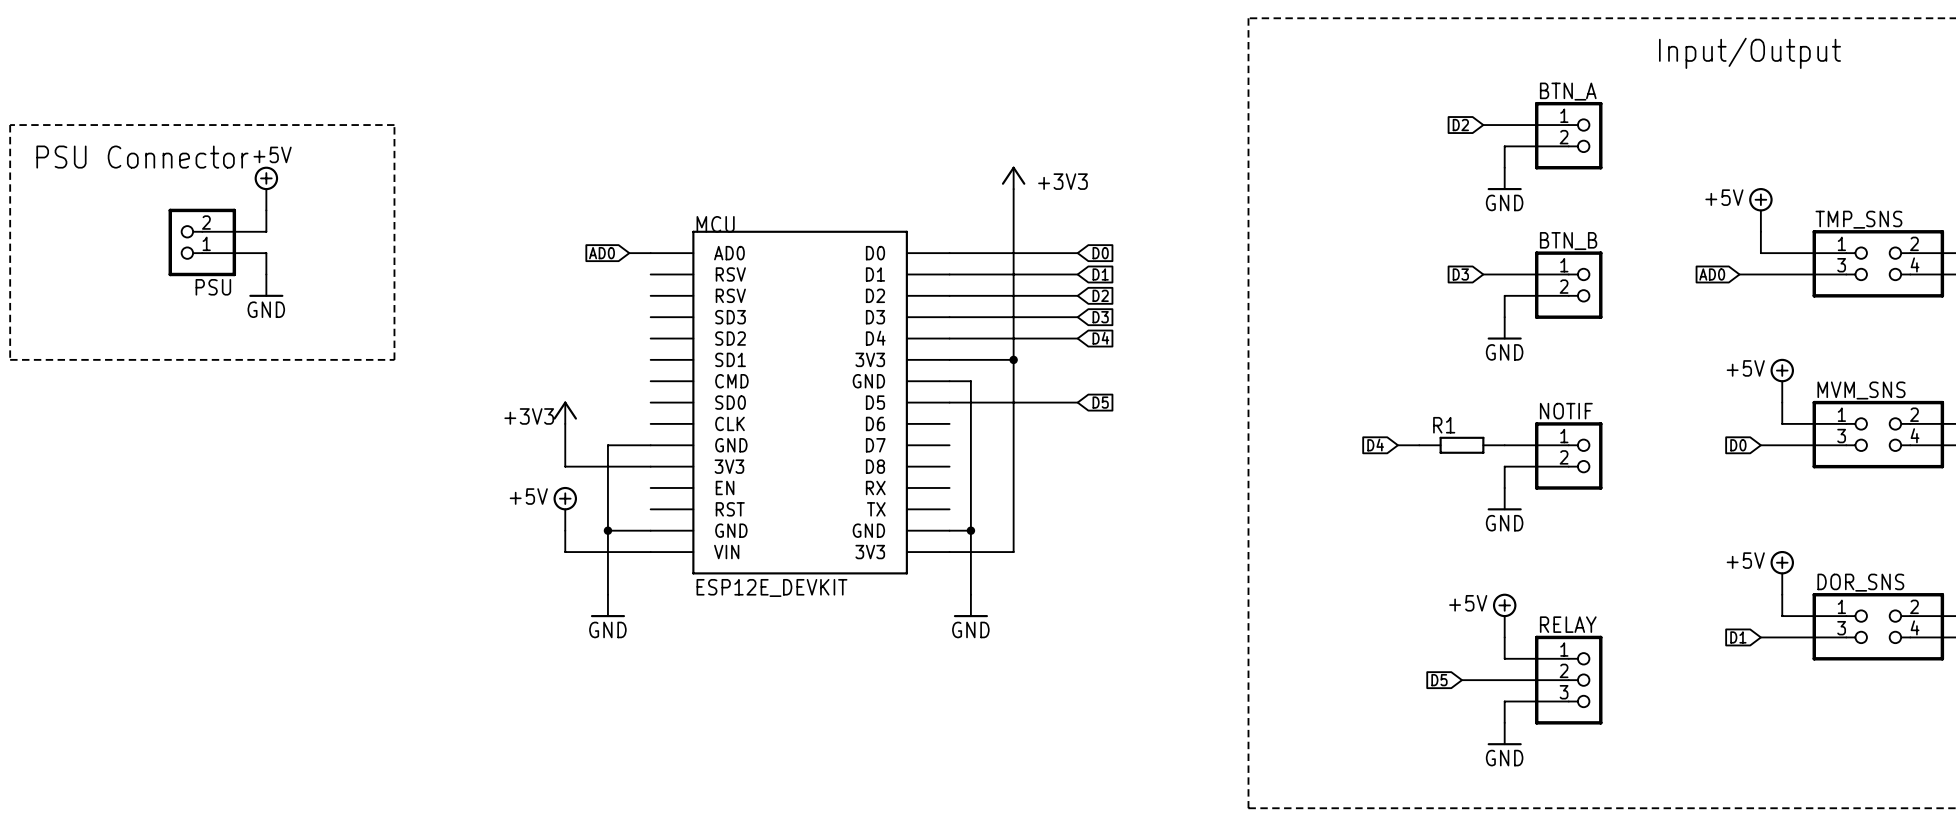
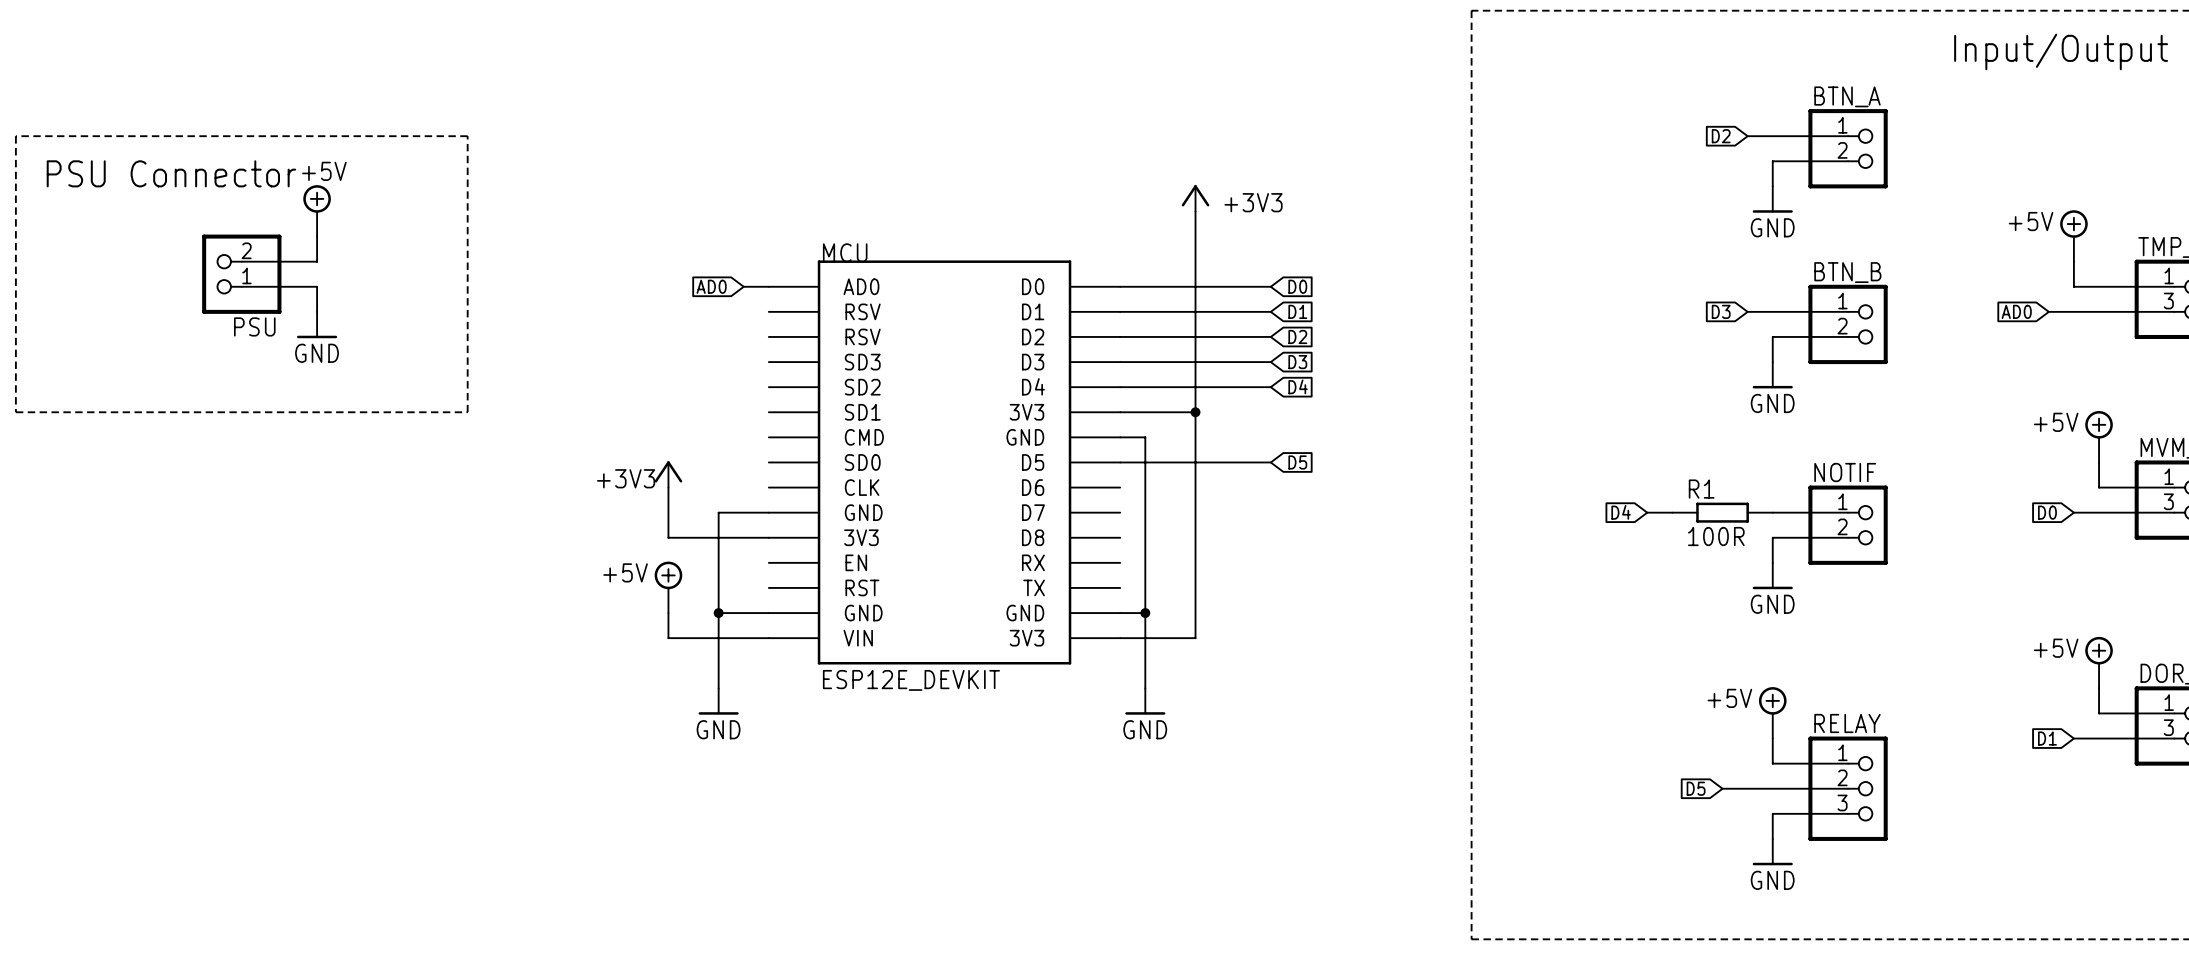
R1 value: none -> 100R (1716, 536)

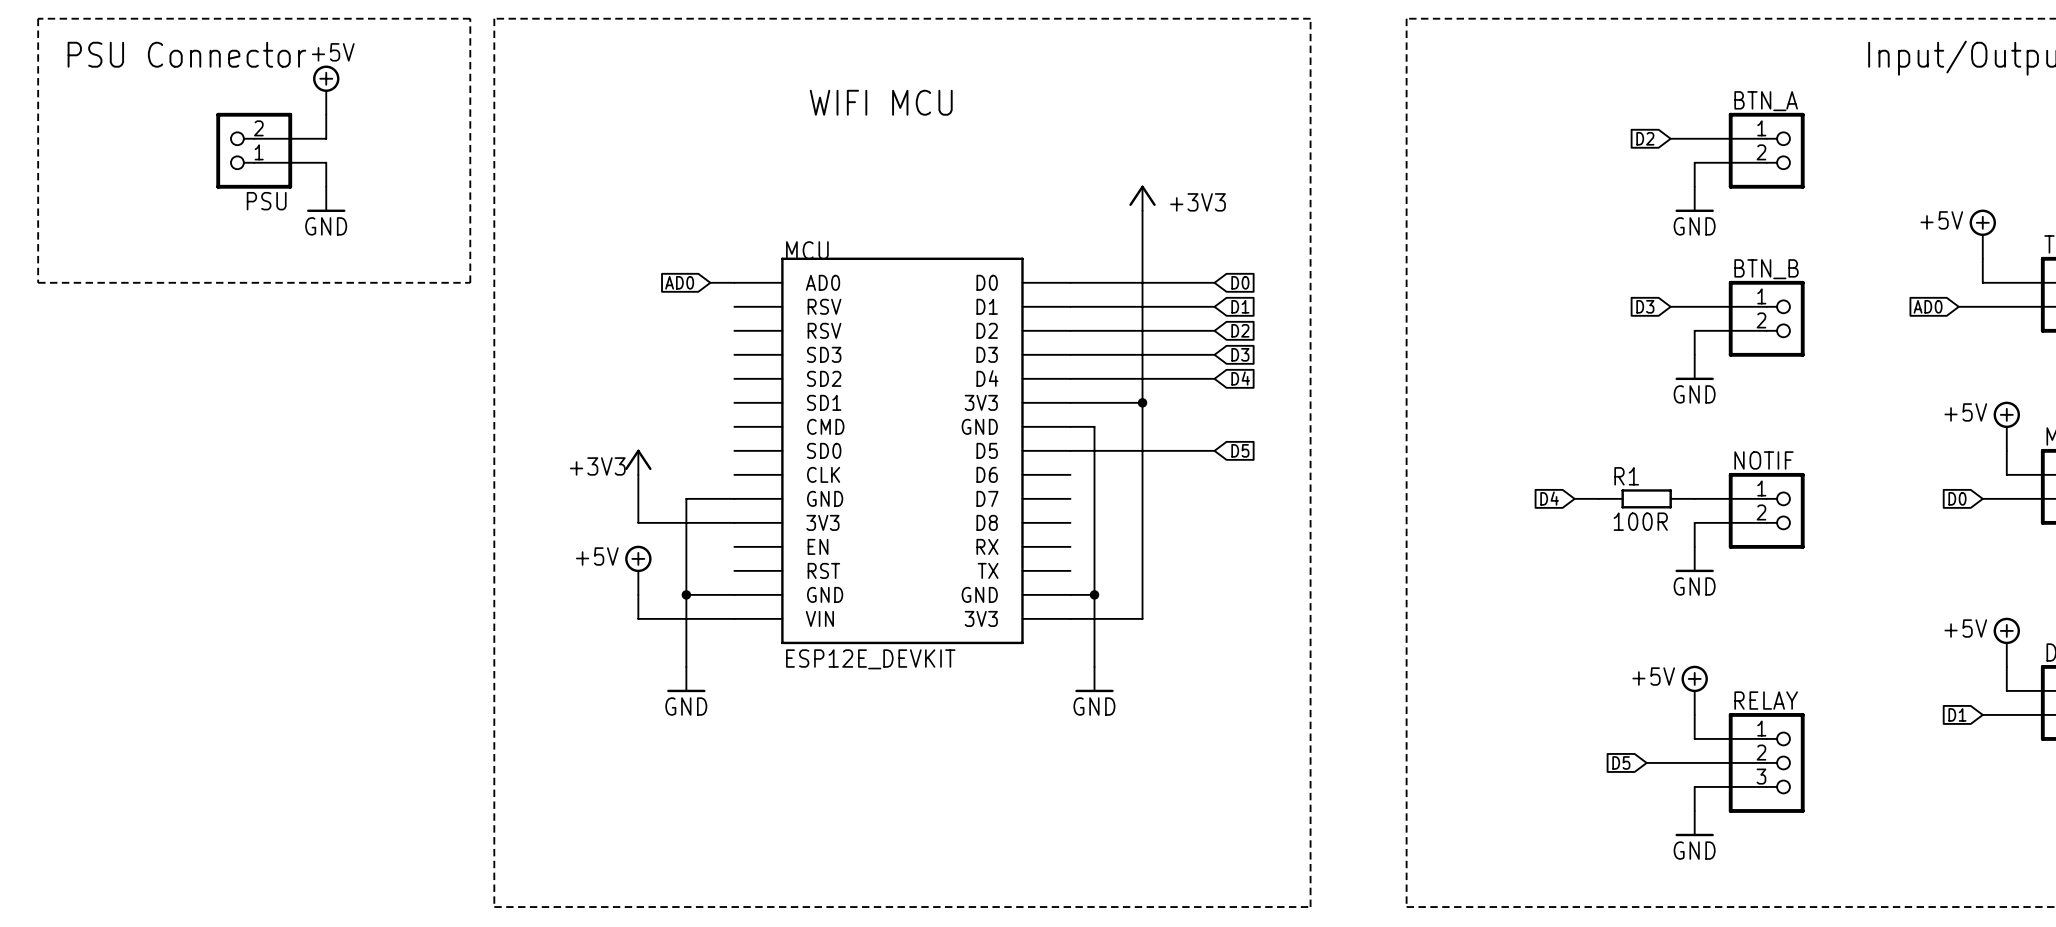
line: none -> (494, 18) (1310, 18) (1310, 907) (494, 907) (494, 18)
text: none -> WIFI MCU (881, 102)
line: (15, 136) (15, 412) (467, 412) (467, 136) (15, 136) -> (38, 18) (38, 282) (470, 282) (470, 18) (38, 18)
text position: PSU Connector (171, 173) -> PSU Connector (186, 54)
power symbol position: +5V (317, 210) -> +5V (326, 90)
wire: (317, 236) (317, 261) (241, 261) -> (326, 114) (326, 138) (254, 138)
PSU position: (241, 274) -> (254, 150)
wire: (241, 286) (317, 286) (317, 311) -> (254, 162) (326, 162) (326, 186)
power symbol position: GND (317, 325) -> GND (326, 199)

